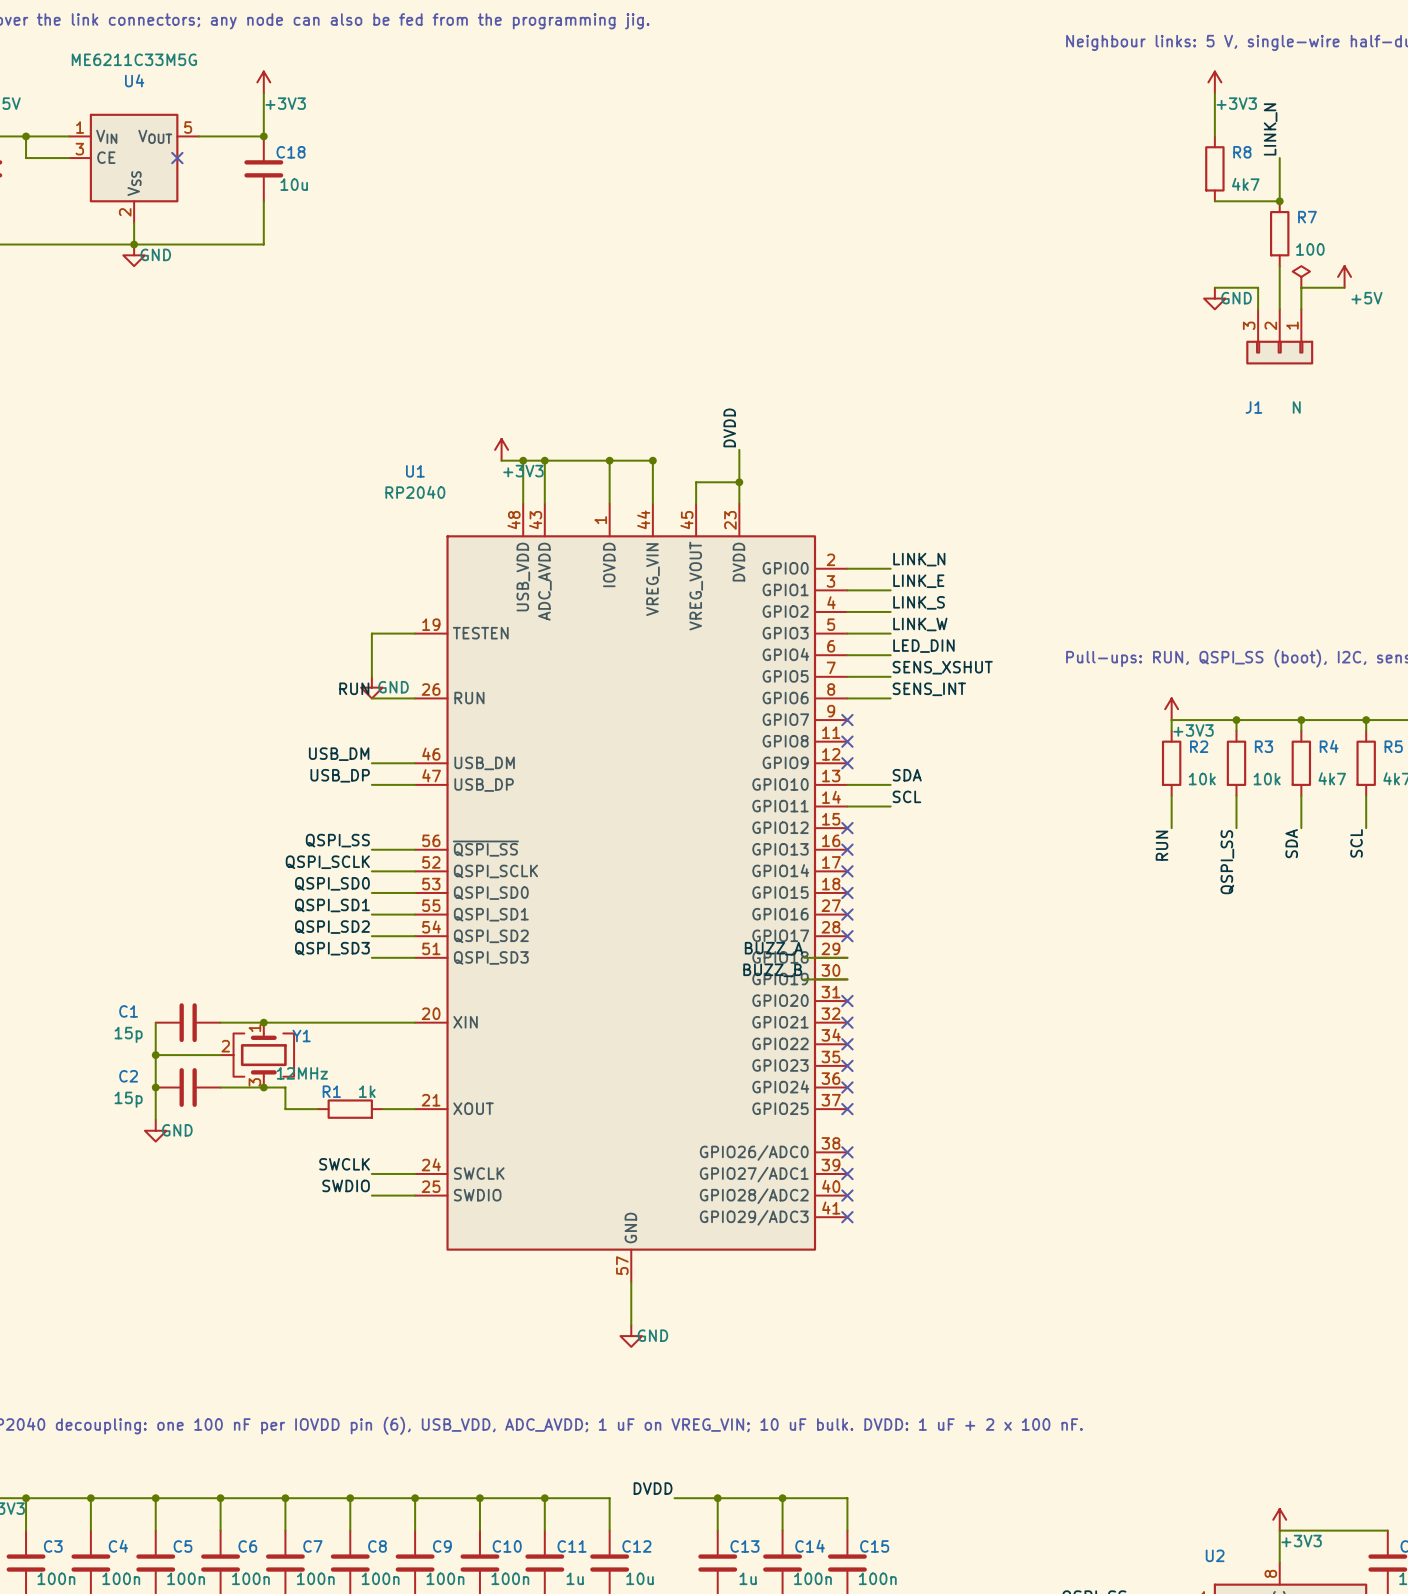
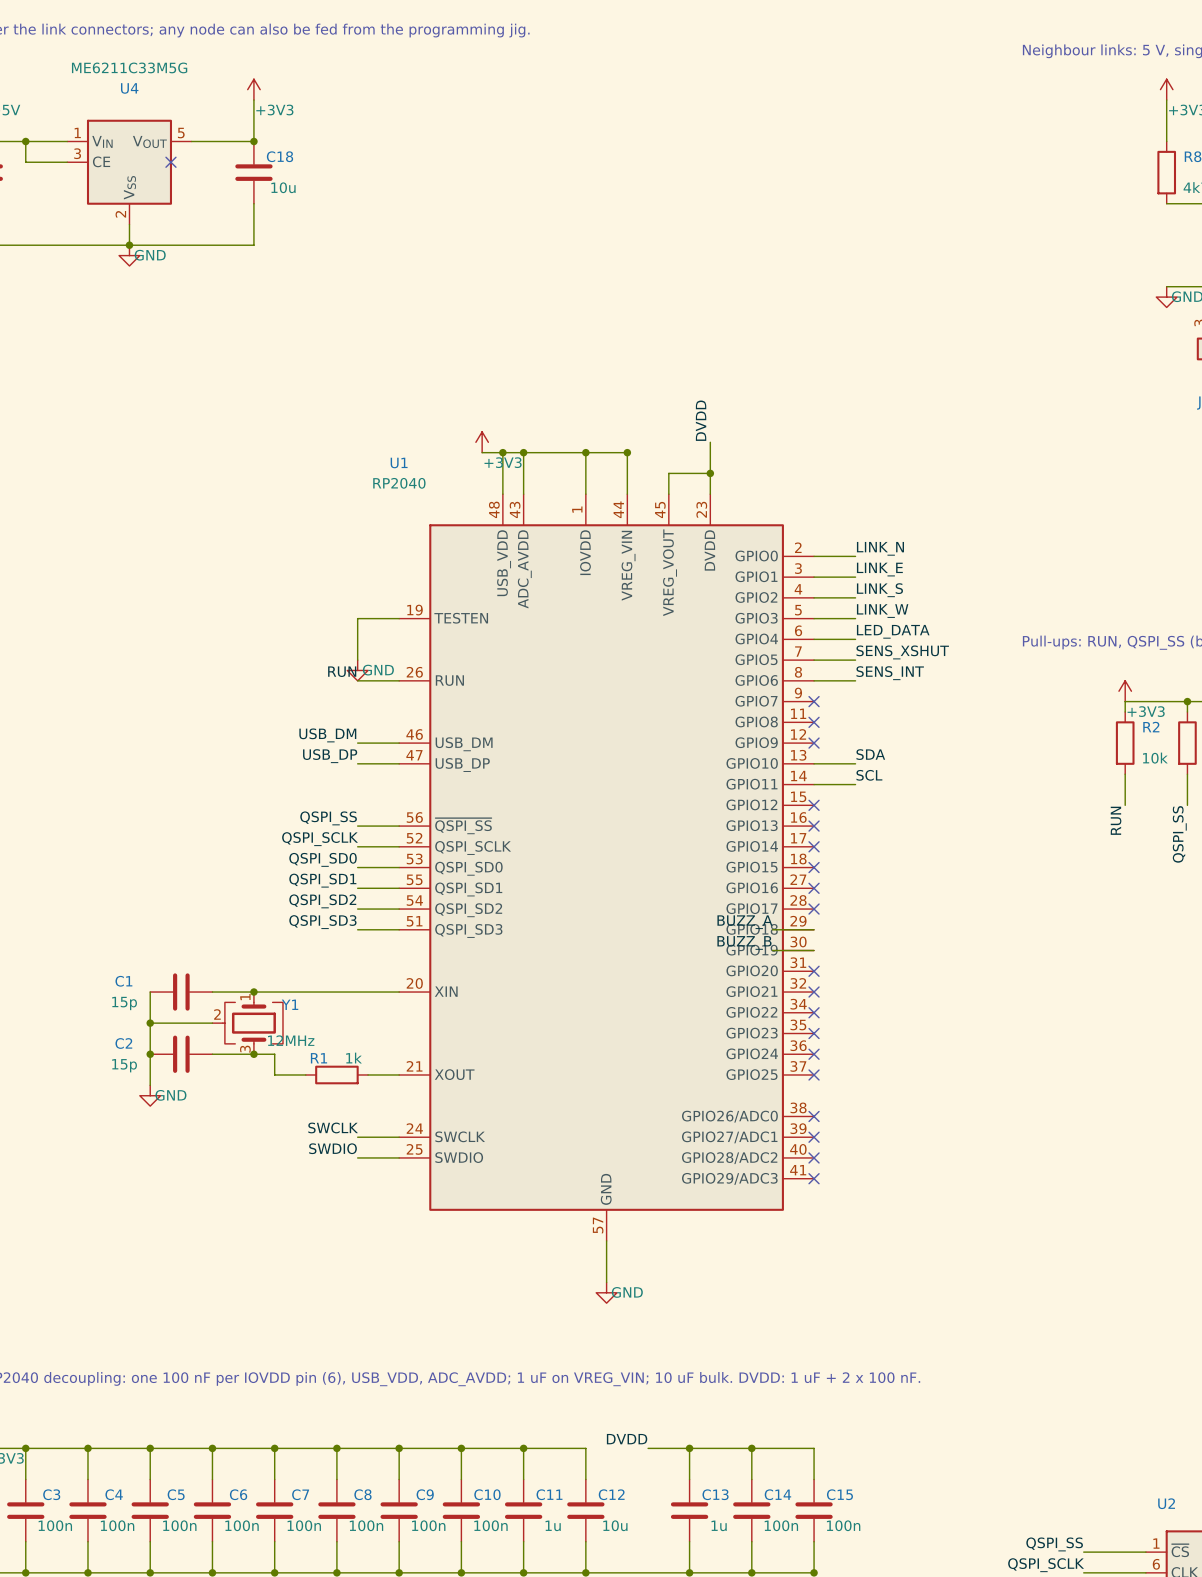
label: LED_DIN (923, 646) -> LED_DATA (893, 631)

